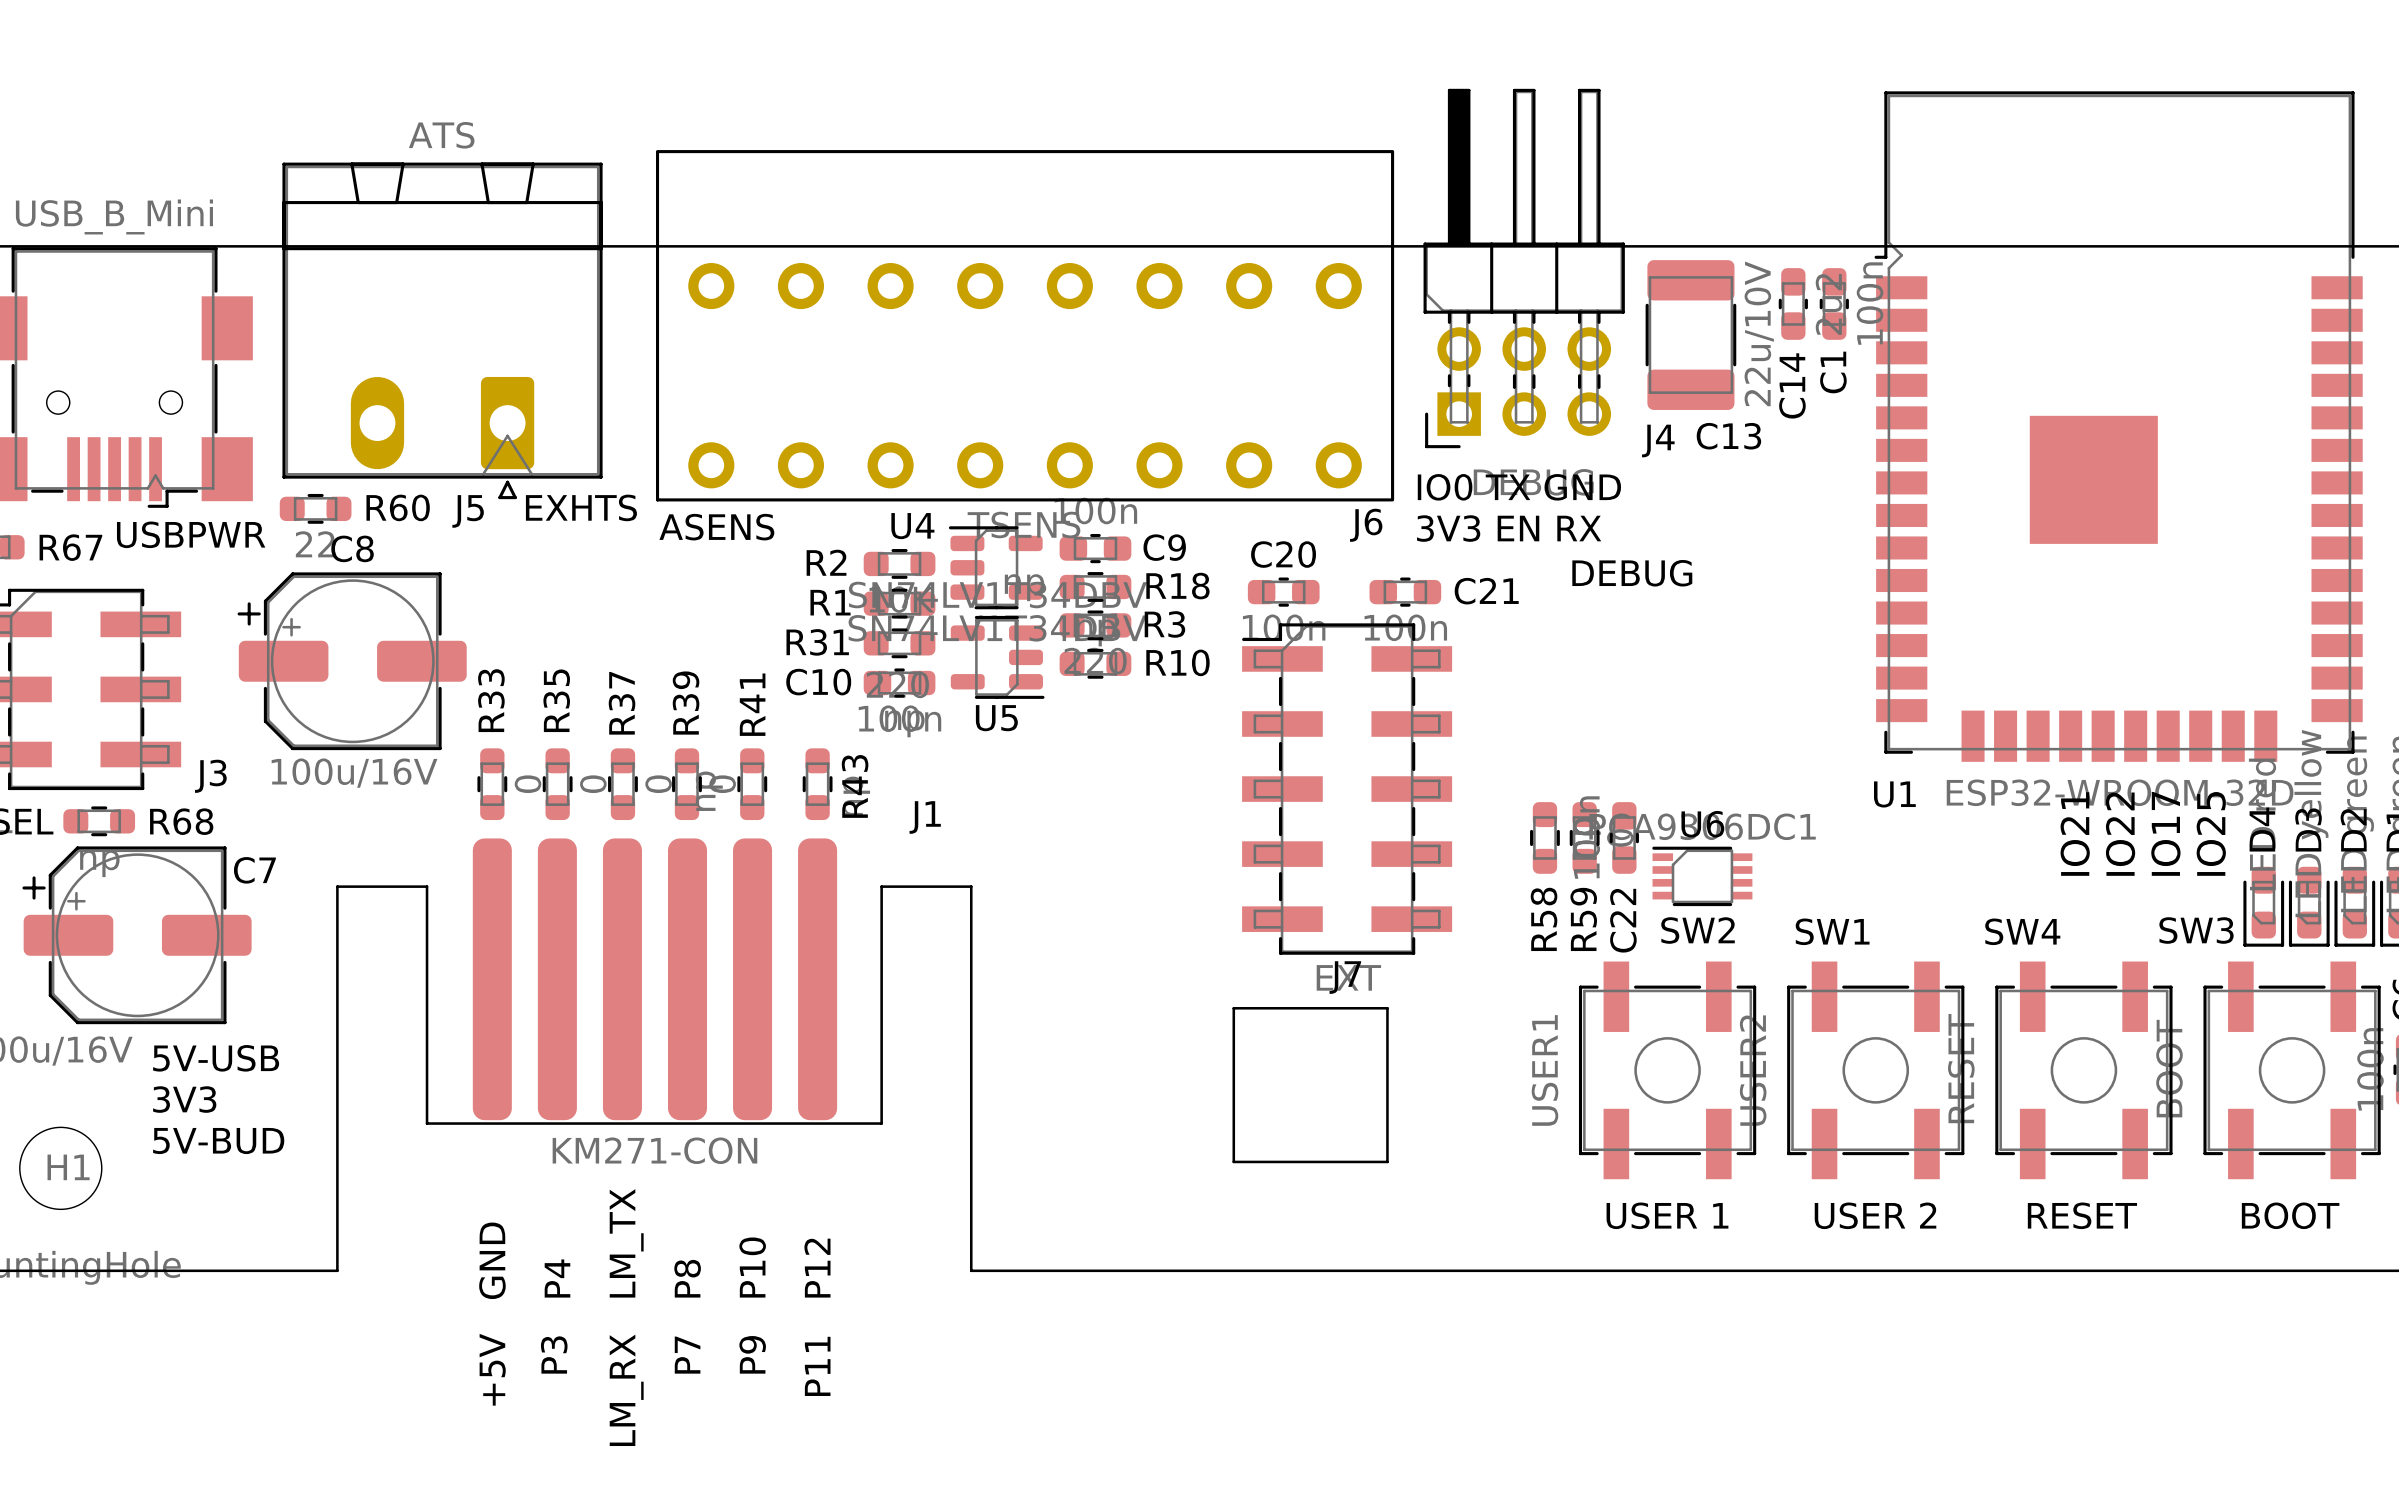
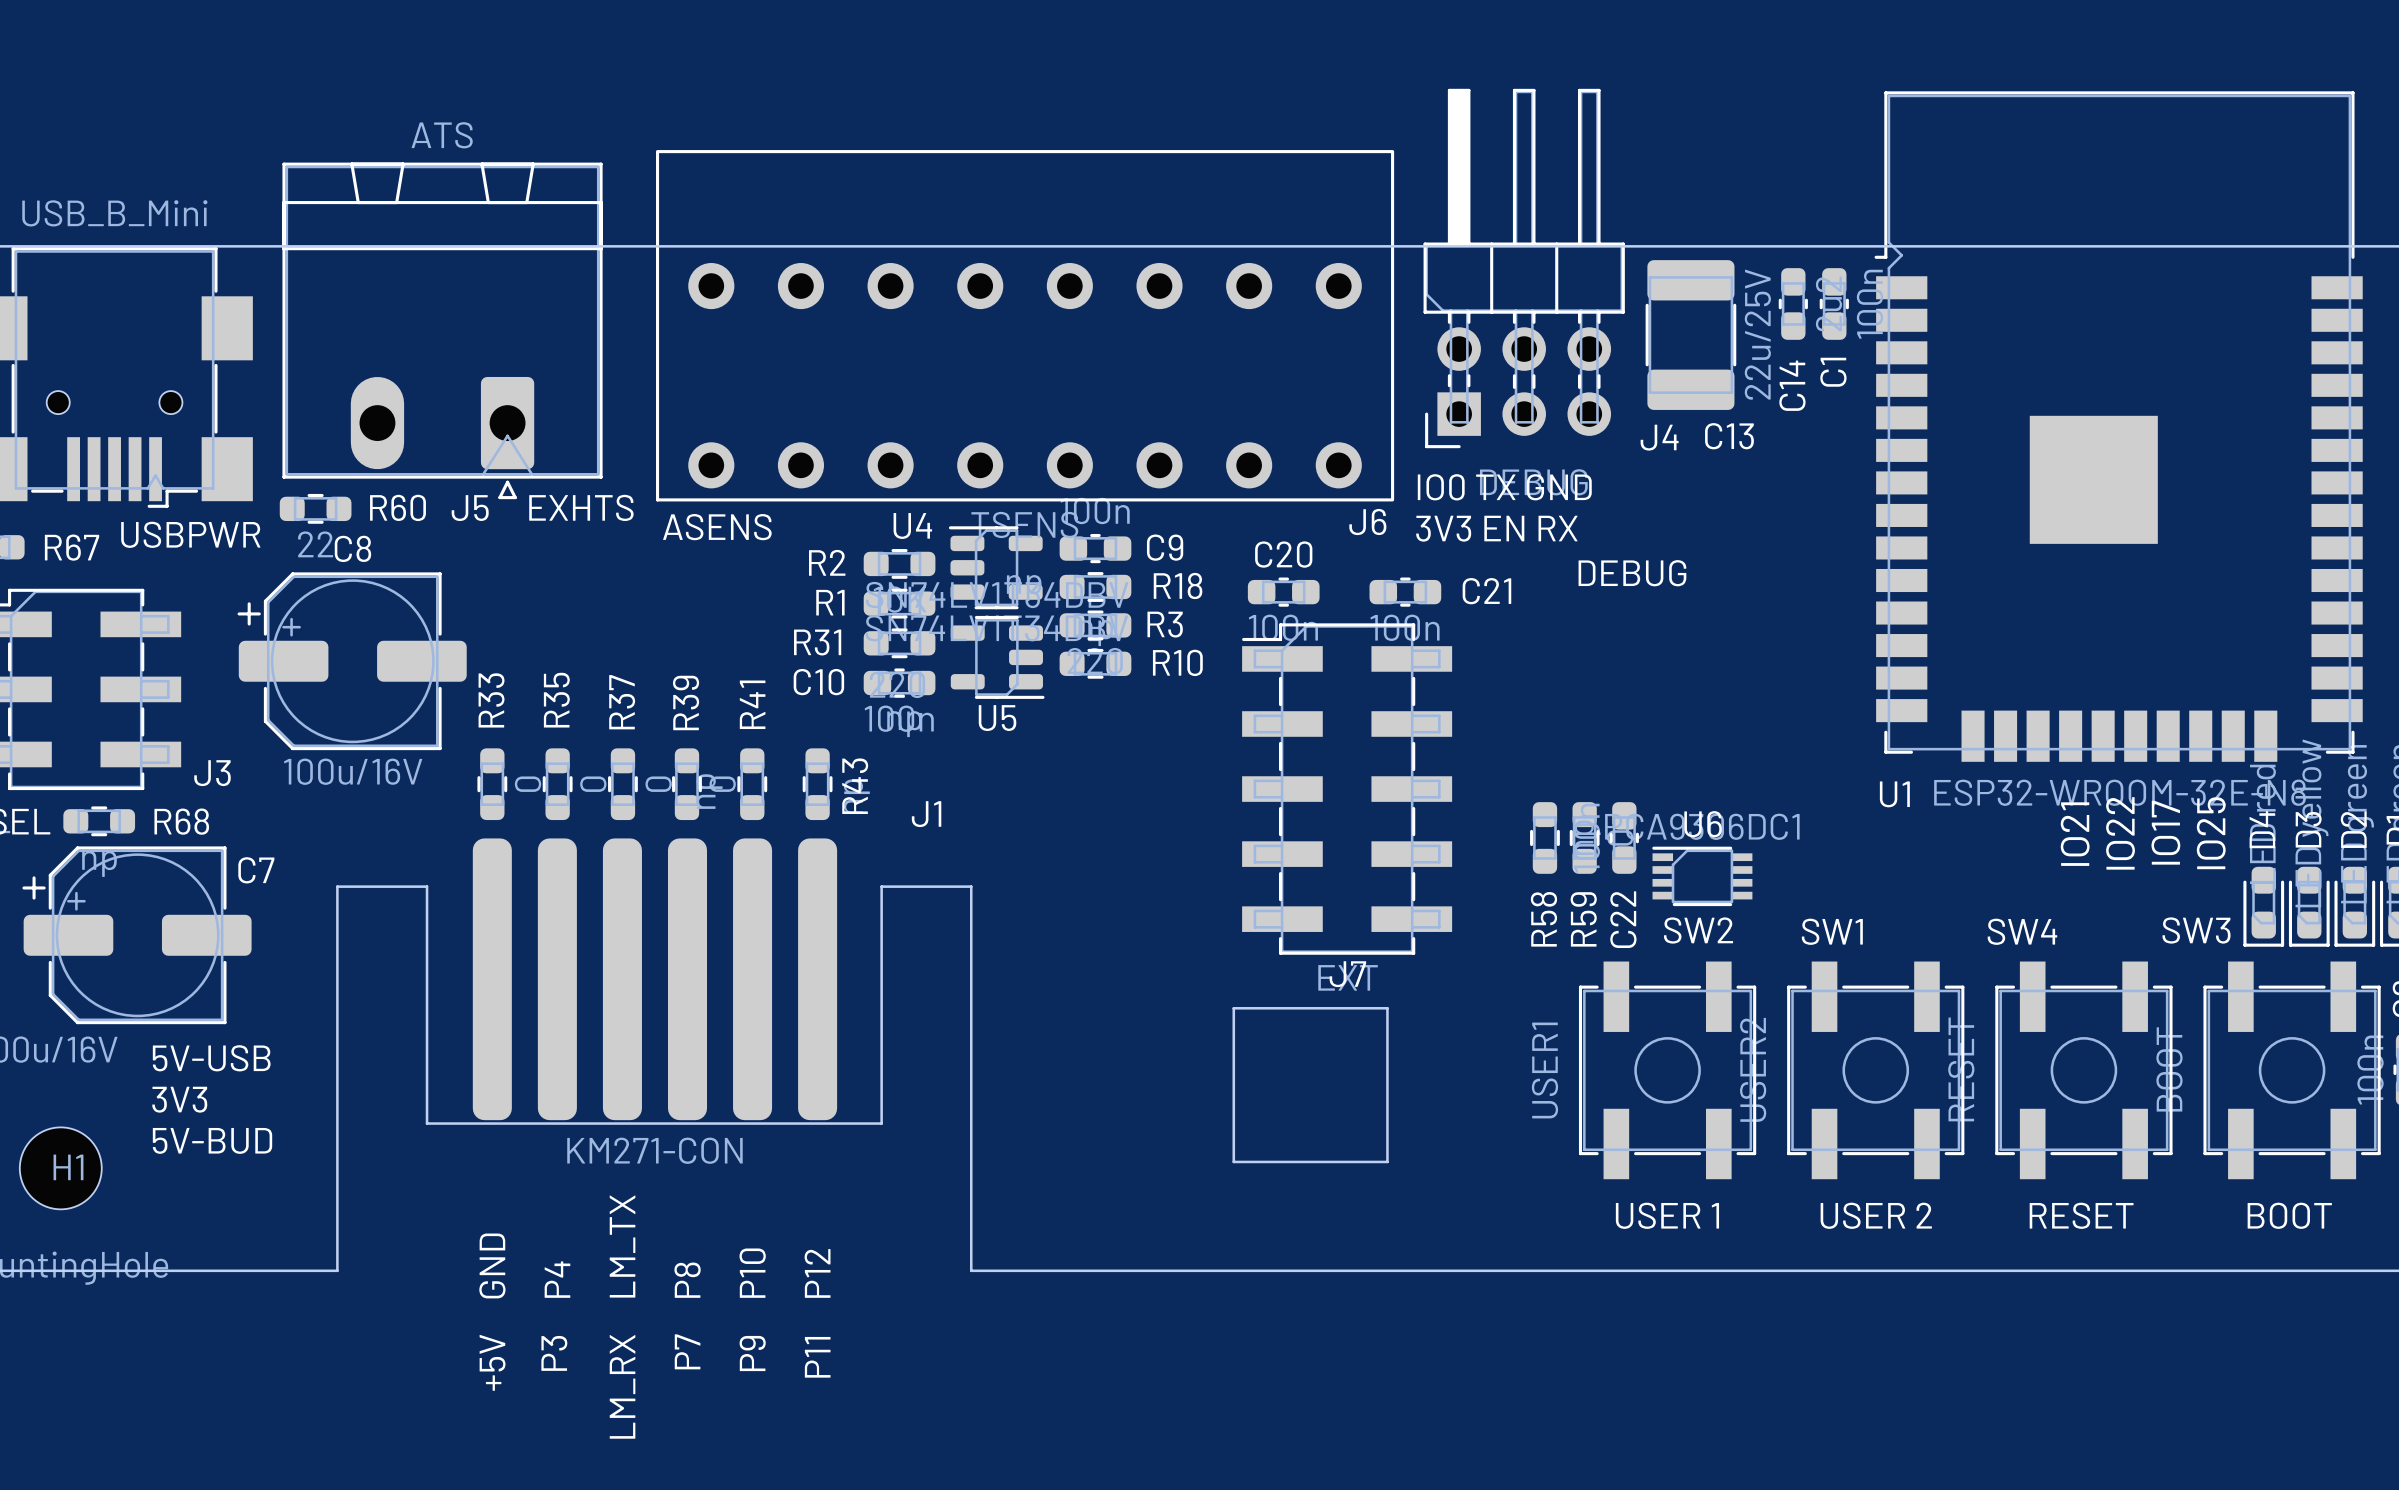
C13 value: 22u/10V (1759, 333) -> 22u/25V (1757, 334)
U1 value: ESP32-WROOM-32D (2120, 792) -> ESP32-WROOM-32E-N8 (2120, 792)

